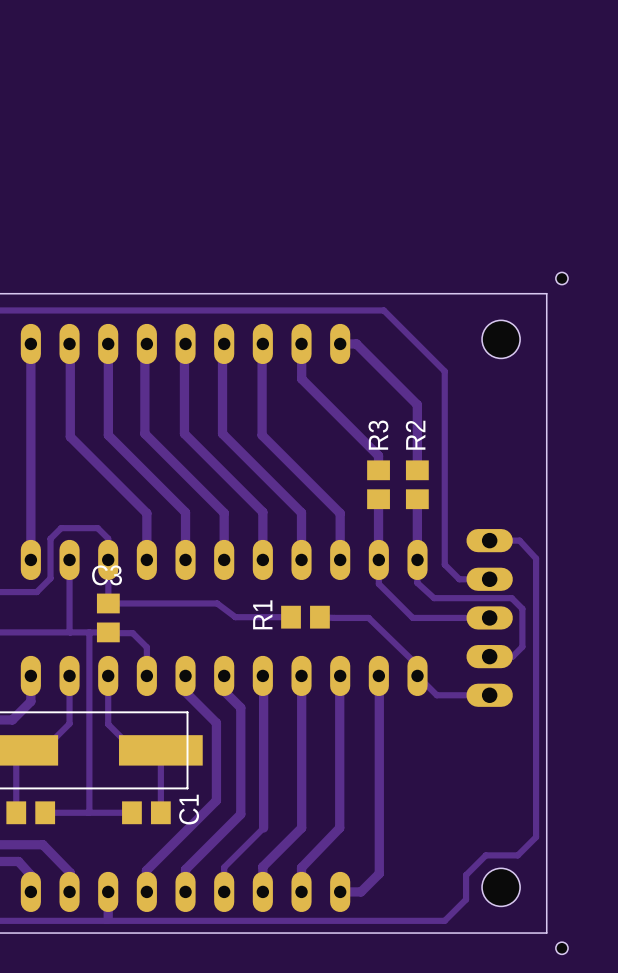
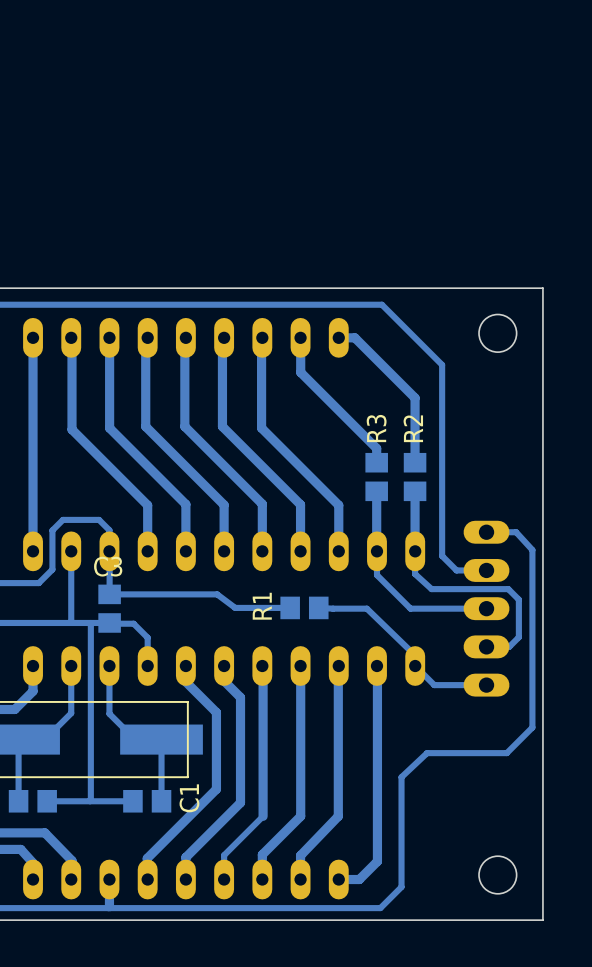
hole: (561, 278) -> none
track: (536, 738) (536, 837) (517, 855) (485, 855) (466, 875) (466, 899) (444, 920) (382, 920) -> (532, 727) (506, 753) (427, 753) (401, 777) (401, 887) (380, 908)
hole: (561, 948) -> none

